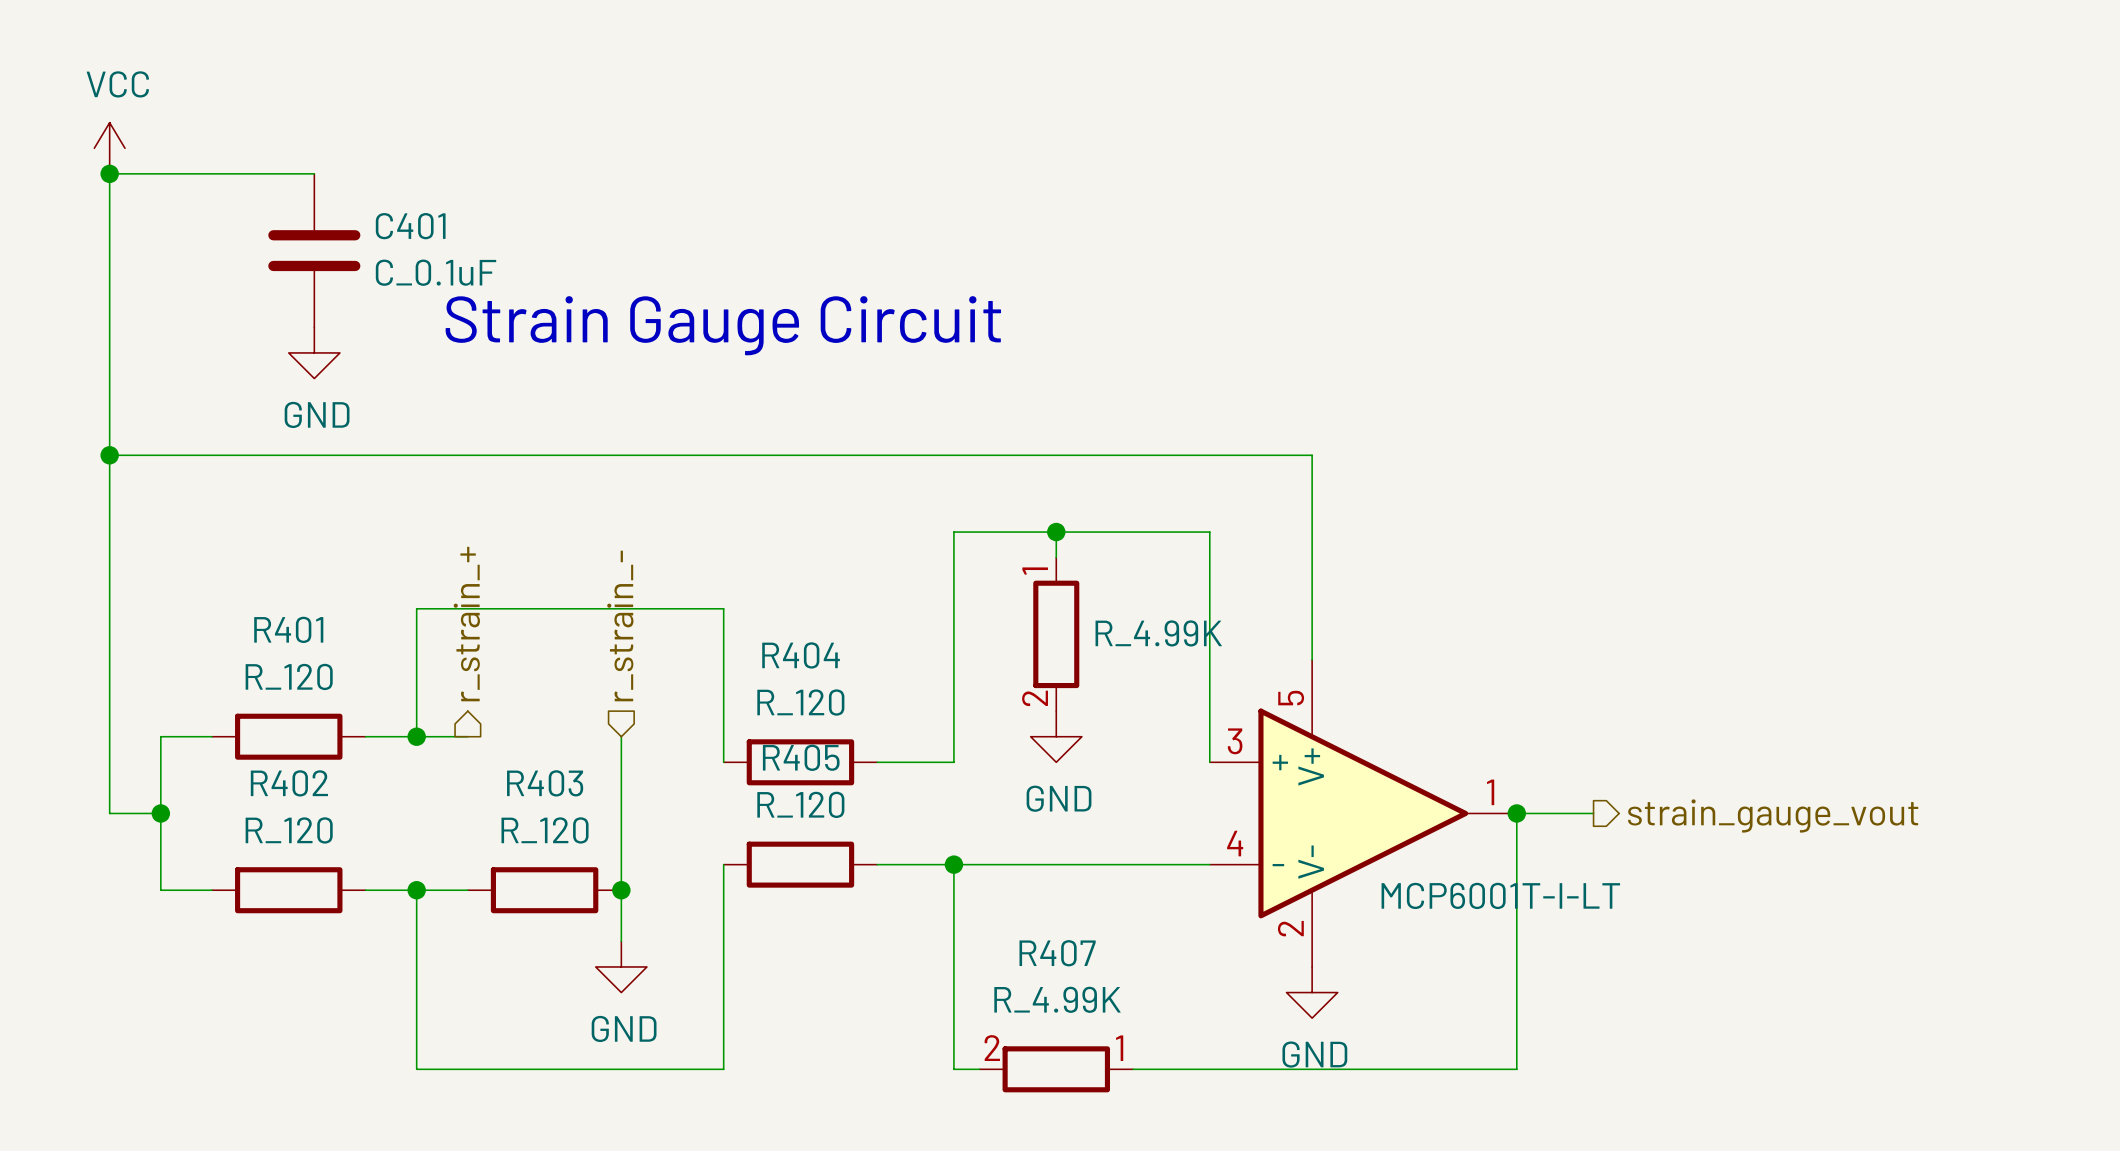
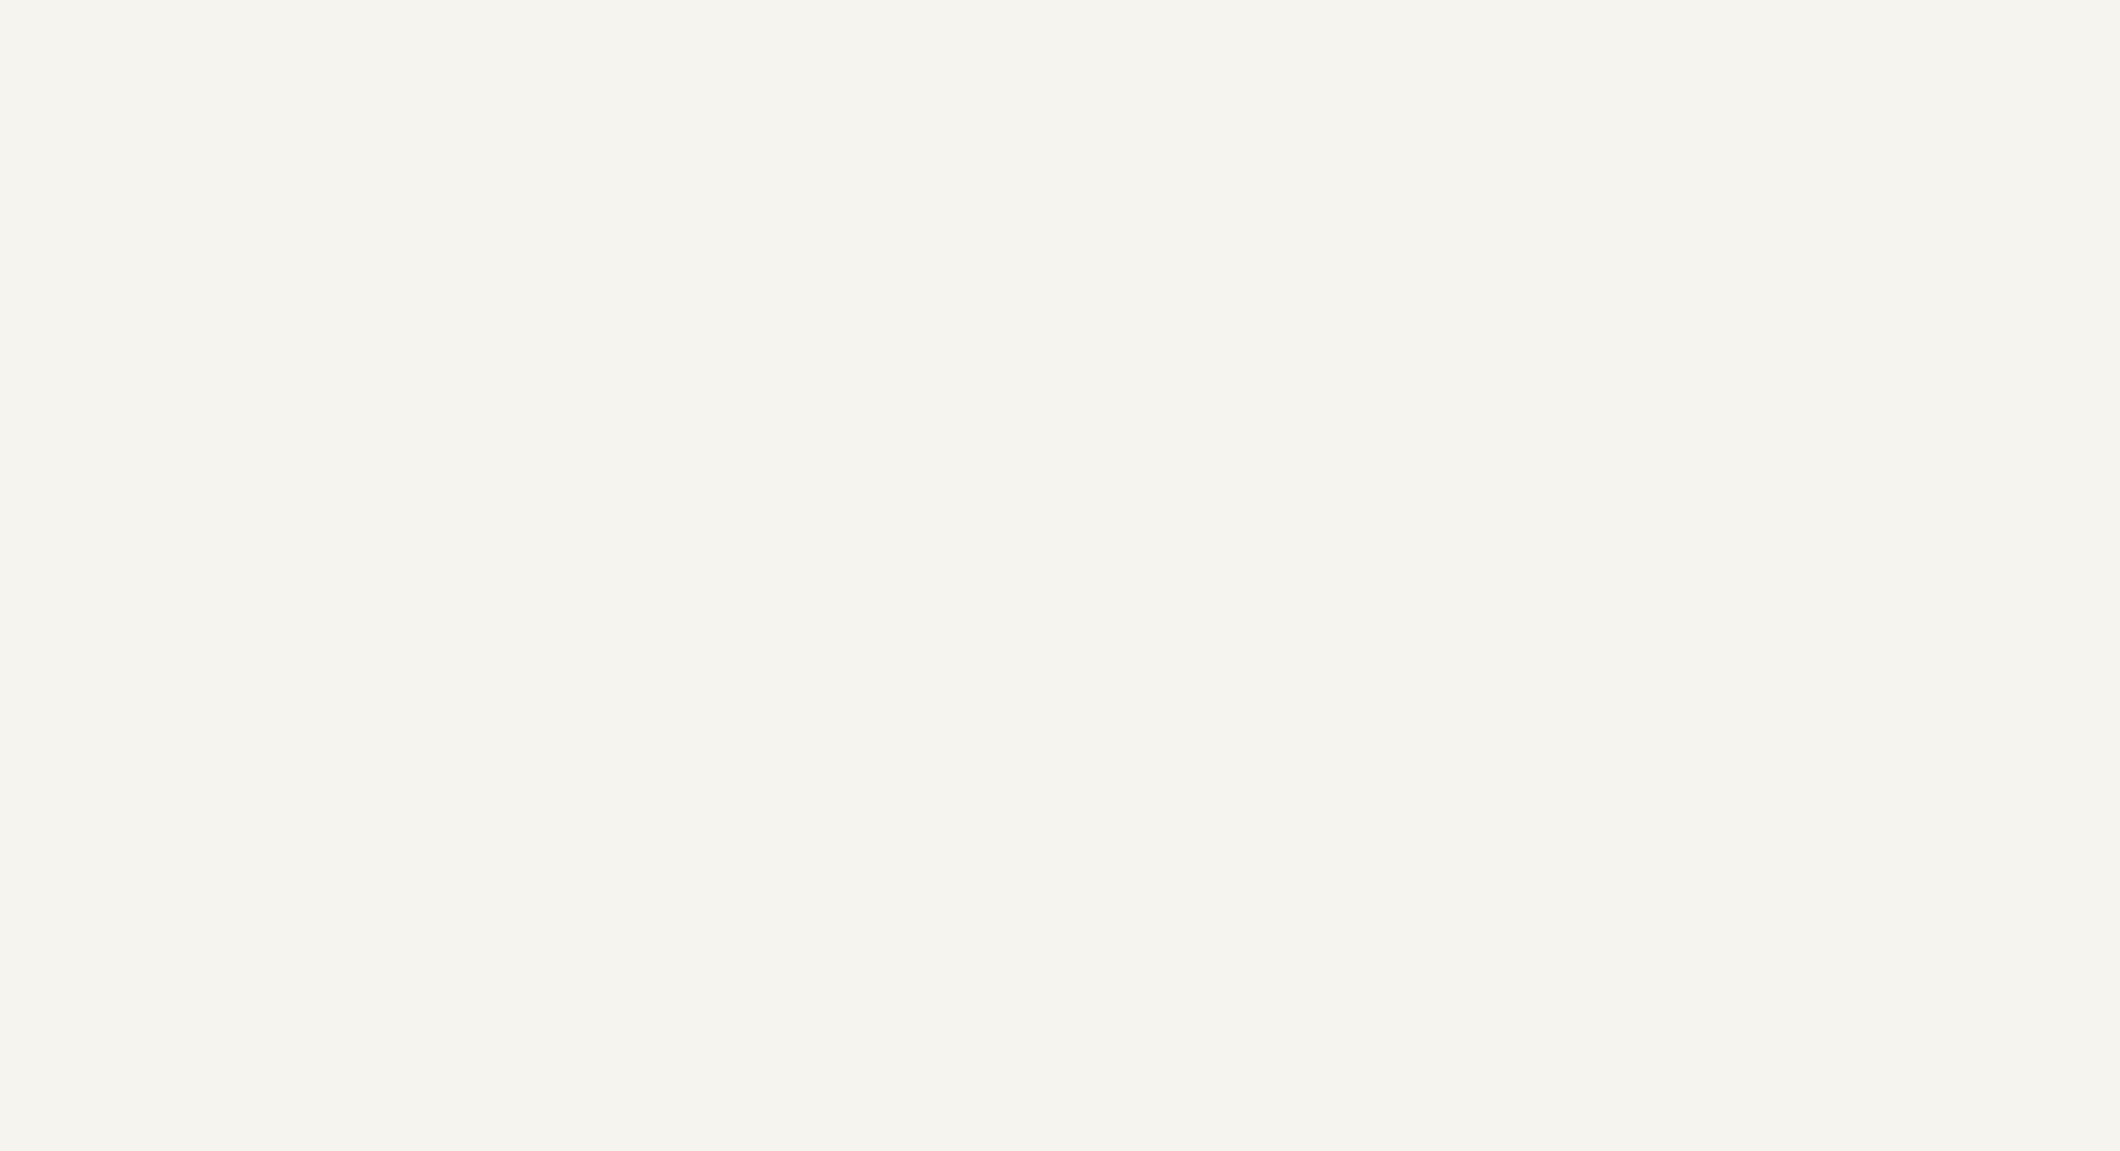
power symbol: VCC (109, 148) -> none
junction: (109, 173) -> none
wire: (314, 173) (109, 173) (109, 813) (160, 813) -> none
C401: C_0.1uF (314, 250) -> none
text: Strain Gauge Circuit (723, 325) -> none
power symbol: GND (314, 352) -> none
wire: (109, 455) (1312, 455) (1312, 659) -> none
junction: (109, 455) -> none
wire: (1056, 532) (1056, 557) -> none
junction: (1056, 532) -> none
hierarchical label: r_strain_+ (466, 624) -> none
hierarchical label: r_strain_- (620, 625) -> none
part: R_4.99K (1056, 634) -> none
wire: (212, 736) (160, 736) (160, 890) (212, 890) -> none
R401: R_120 (288, 736) -> none
wire: (365, 736) (467, 736) -> none
wire: (416, 736) (416, 608) (723, 608) (723, 762) -> none
junction: (416, 736) -> none
wire: (621, 736) (621, 941) -> none
power symbol: GND (1056, 736) -> none
R404: R_120 (800, 762) -> none
wire: (877, 762) (953, 762) (953, 532) (1209, 532) (1209, 762) -> none
junction: (160, 813) -> none
part: MCP6001T-I-LT (1363, 813) -> none
junction: (1516, 813) -> none
wire: (1593, 813) (1516, 813) (1516, 1069) (1133, 1069) -> none
hierarchical label: strain_gauge_vout (1773, 815) -> none
wire: (723, 864) (723, 1069) (416, 1069) (416, 890) -> none
R405: R_120 (800, 864) -> none
wire: (877, 864) (1209, 864) -> none
wire: (953, 864) (953, 1069) (979, 1069) -> none
junction: (953, 864) -> none
R402: R_120 (288, 890) -> none
wire: (365, 890) (467, 890) -> none
junction: (416, 890) -> none
R403: R_120 (544, 890) -> none
junction: (621, 890) -> none
power symbol: GND (621, 966) -> none
power symbol: GND (1312, 992) -> none
R407: R_4.99K (1056, 1069) -> none

